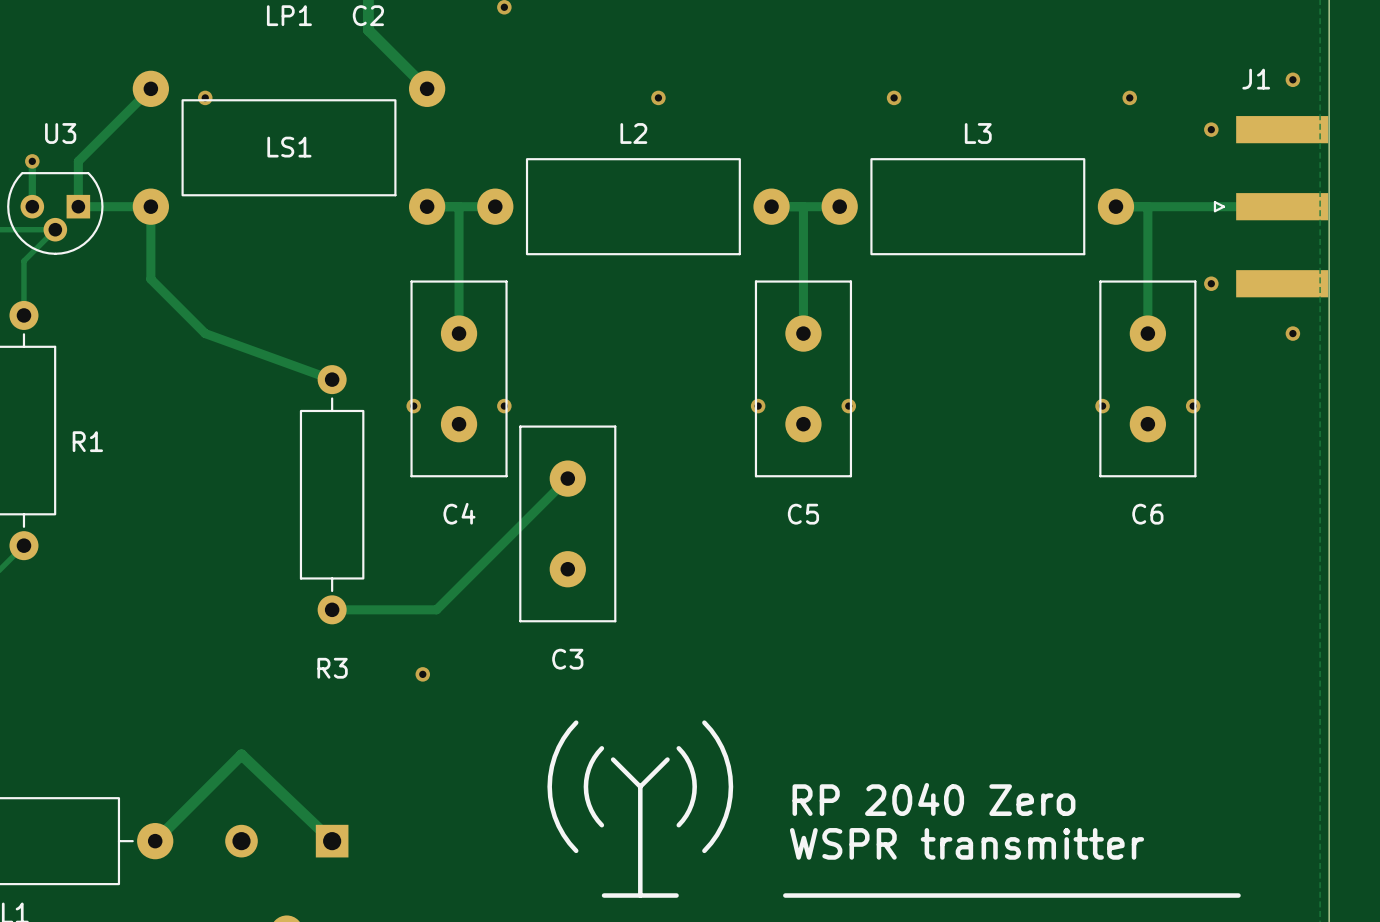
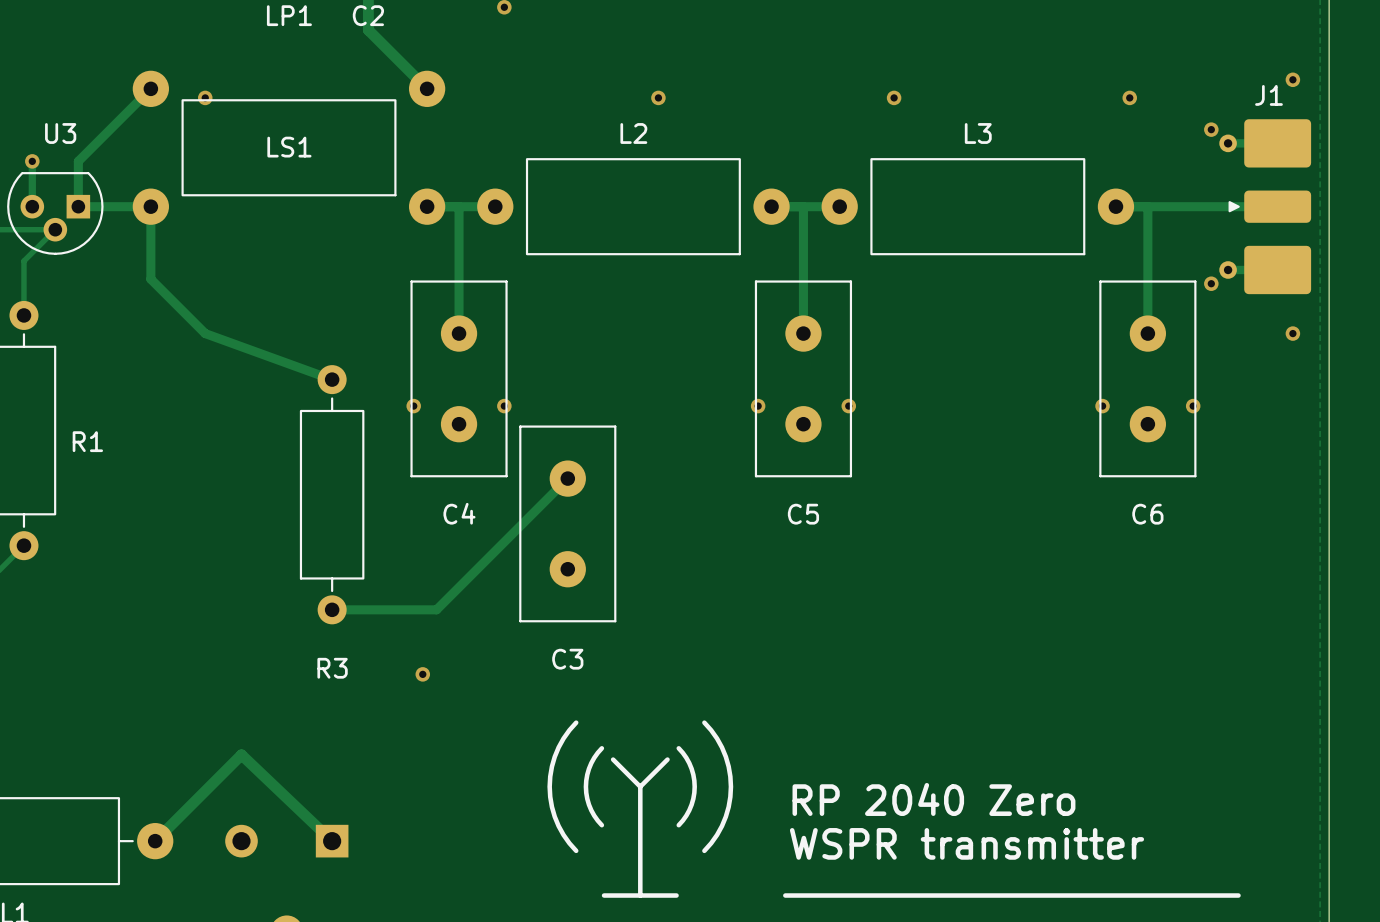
J1 footprint: [1213, 116, 1329, 298] -> [1219, 119, 1312, 295]

